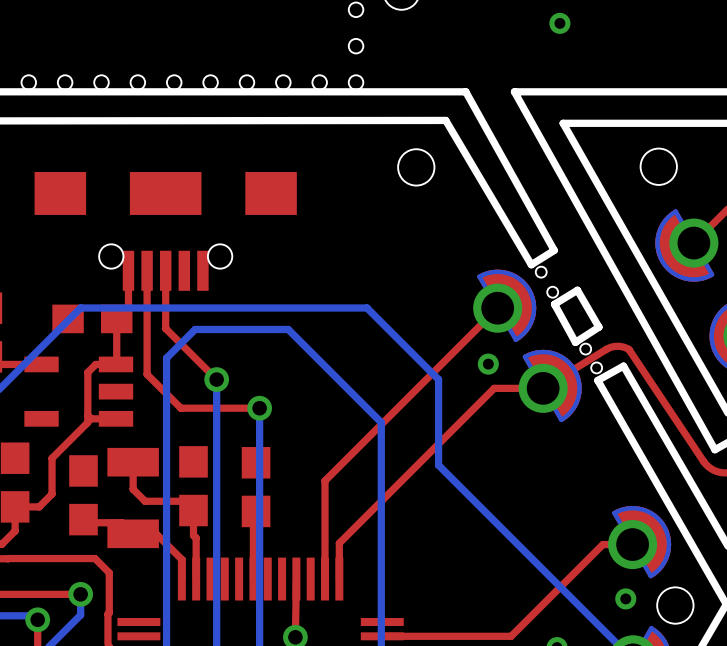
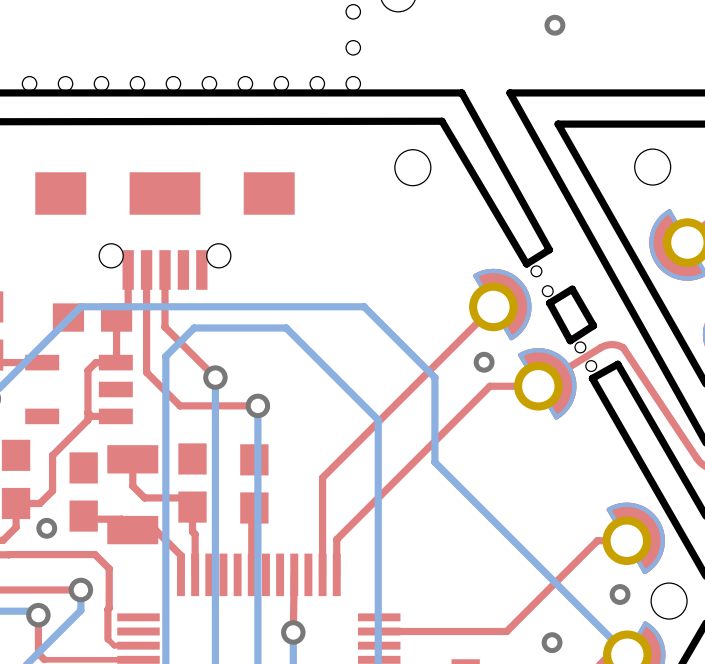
via: none -> (46, 528)

